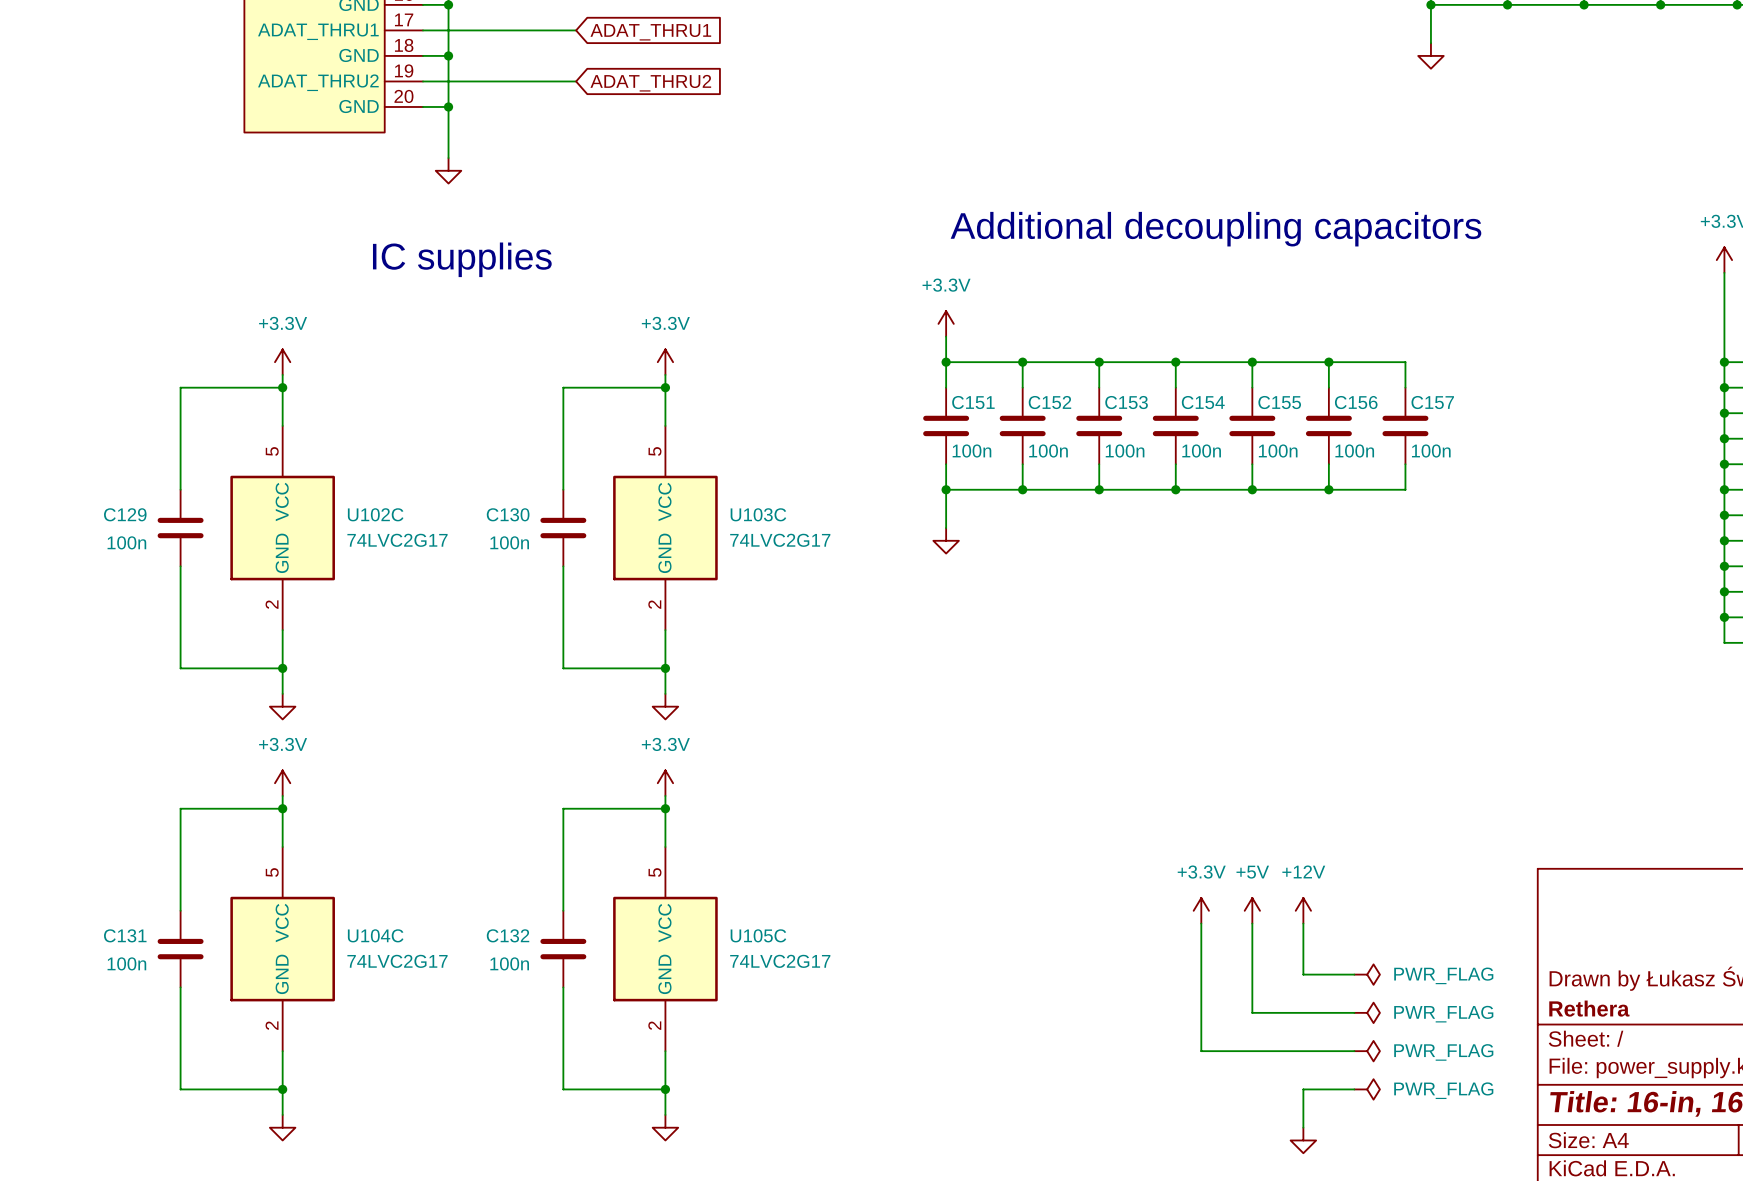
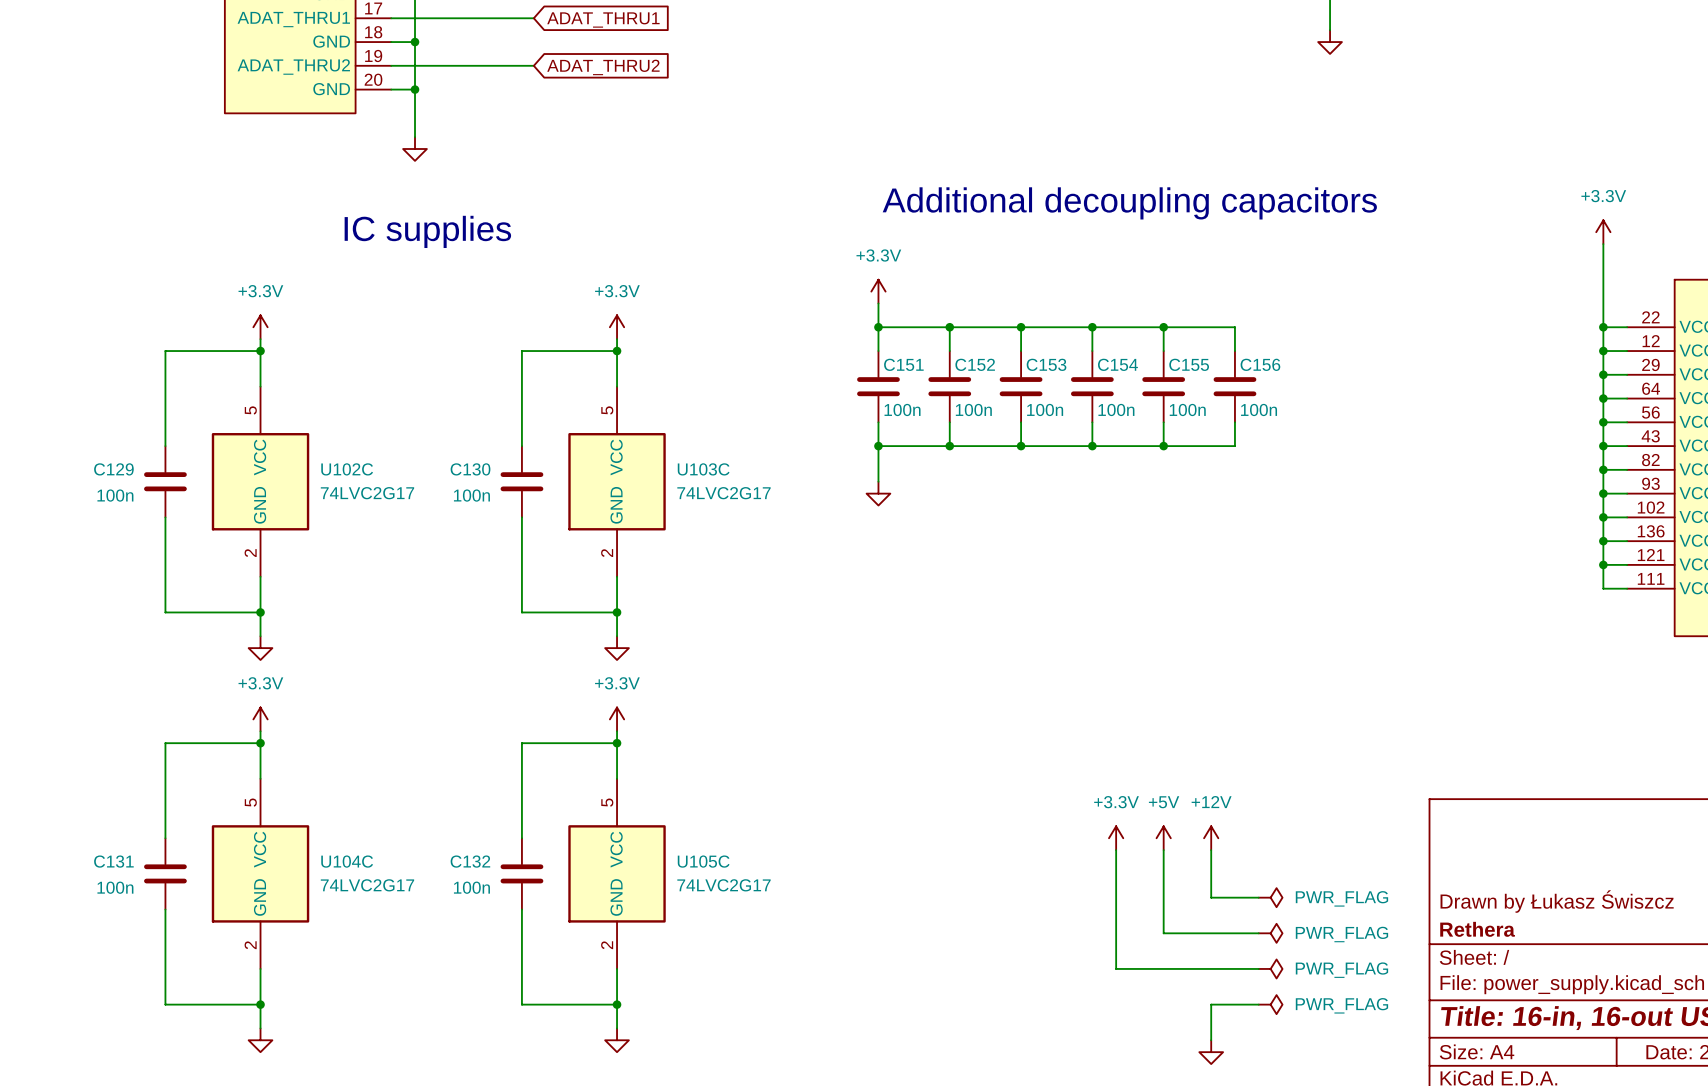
wire: (1328, 362) (1405, 362) (1405, 387) -> none
junction: (1328, 362) -> none
C157: 100n (1405, 425) -> none
wire: (1405, 464) (1405, 489) (1328, 489) -> none
junction: (1328, 489) -> none

